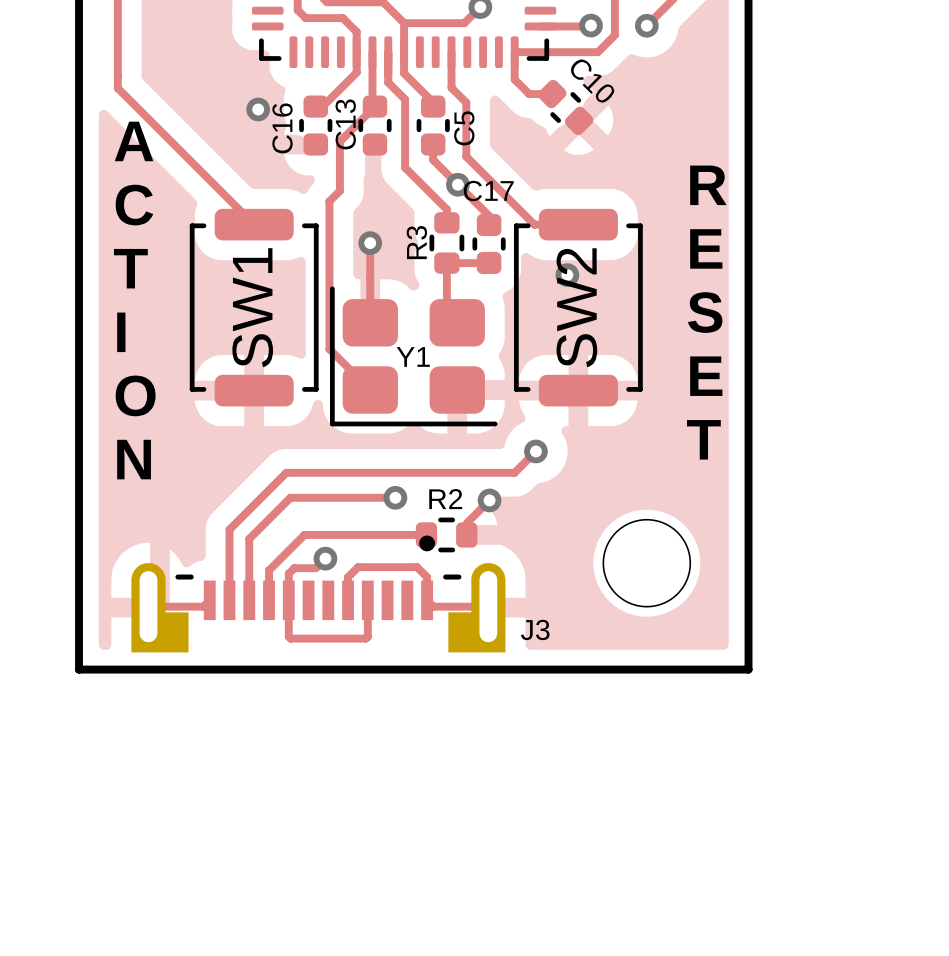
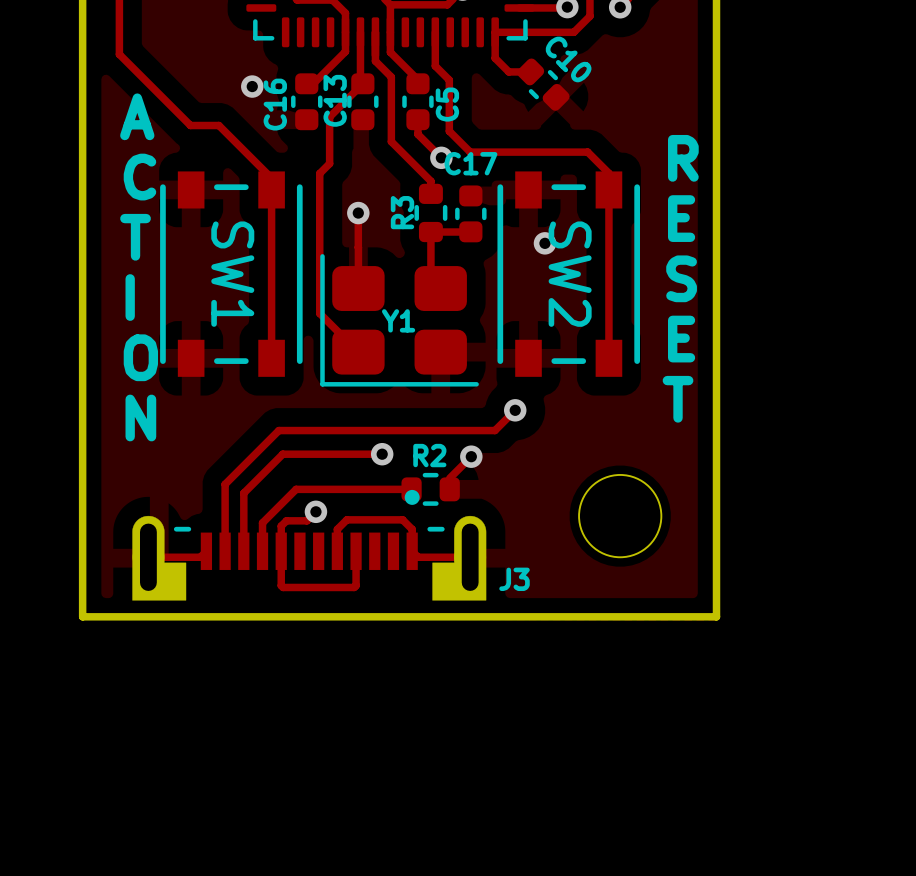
track: (117, 75) (117, 88) (254, 224) -> (119, 54) (190, 125) (218, 125) (271, 178) (271, 358)
track: (488, 178) (534, 224) (578, 224) -> (470, 152) (587, 152) (608, 173) (608, 358)
track: (457, 184) (489, 215) (489, 225) -> none
SW1 footprint: [189, 208, 319, 407] -> [160, 171, 303, 377]
SW2 footprint: [513, 208, 643, 407] -> [497, 171, 641, 377]

